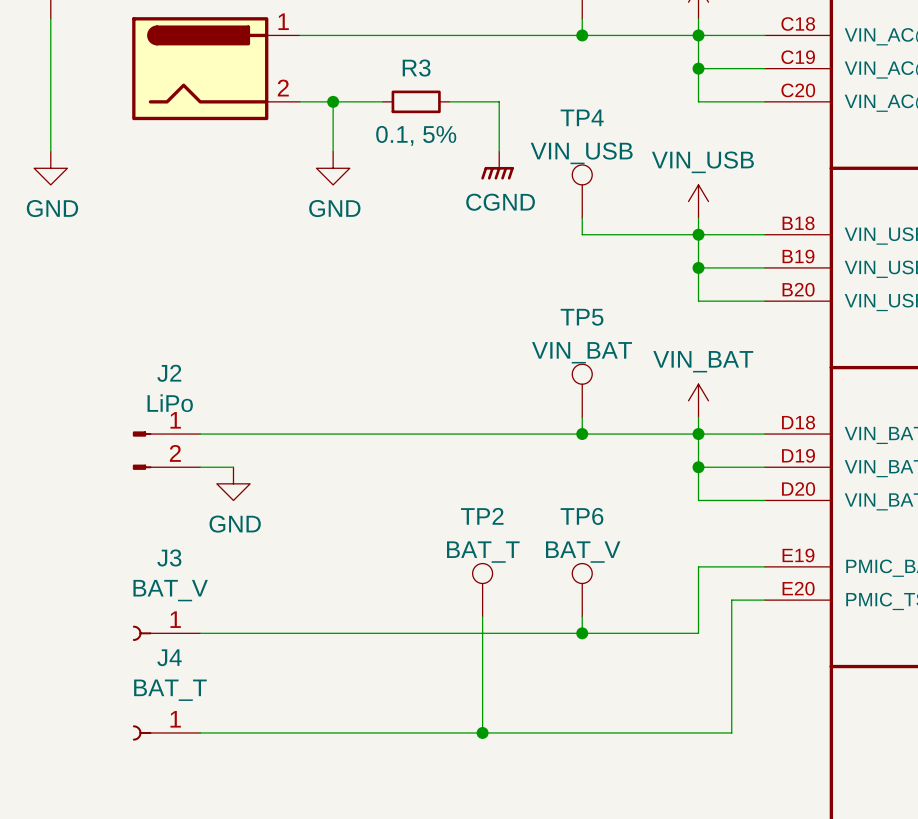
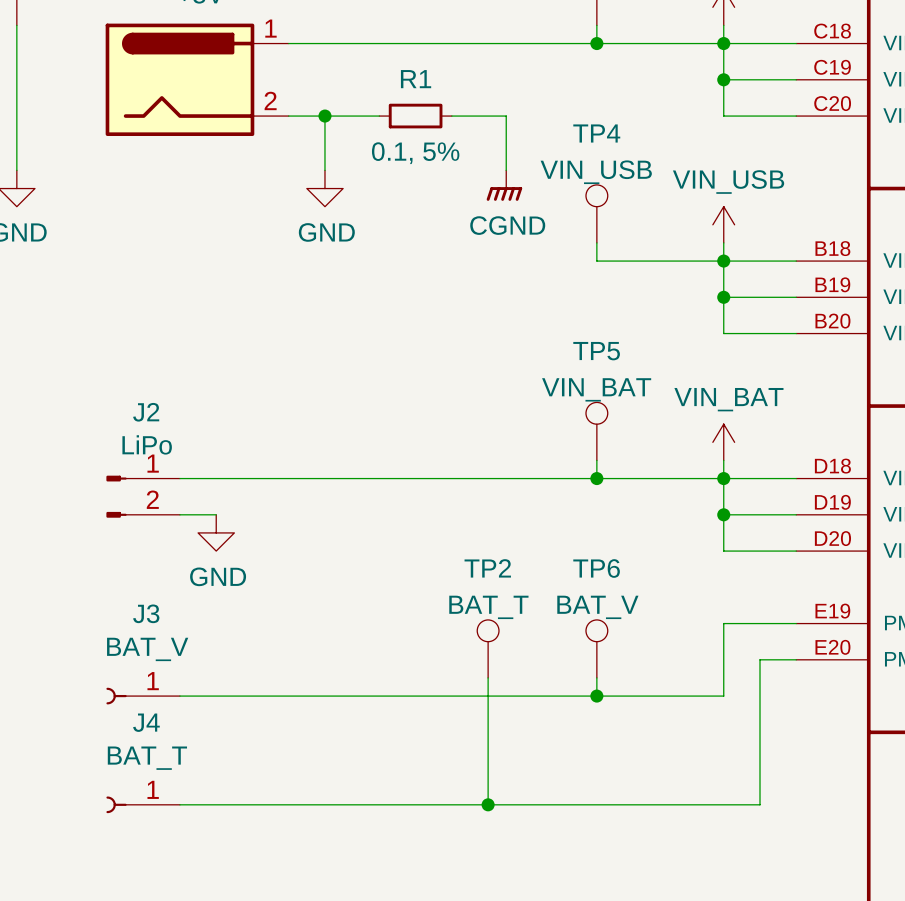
R3 name: R3 (416, 68) -> R1 (416, 79)

